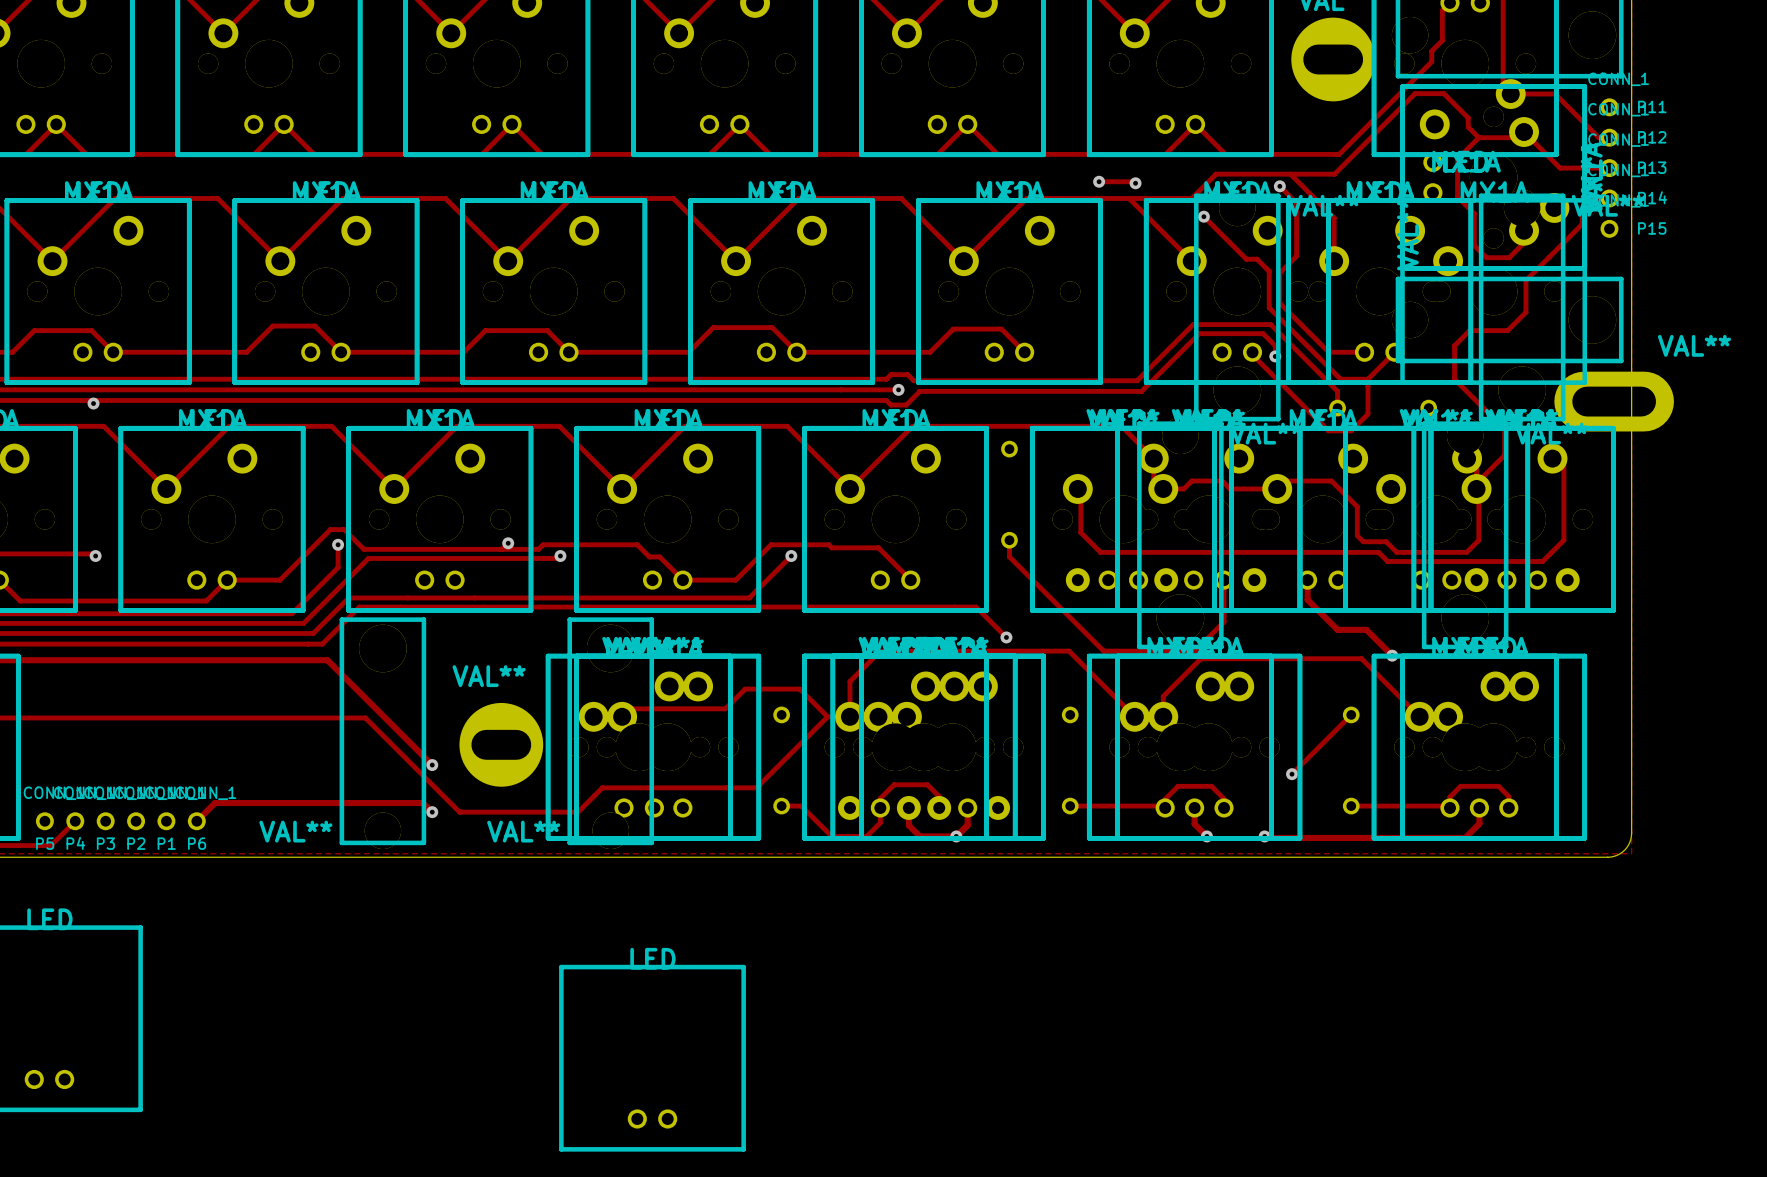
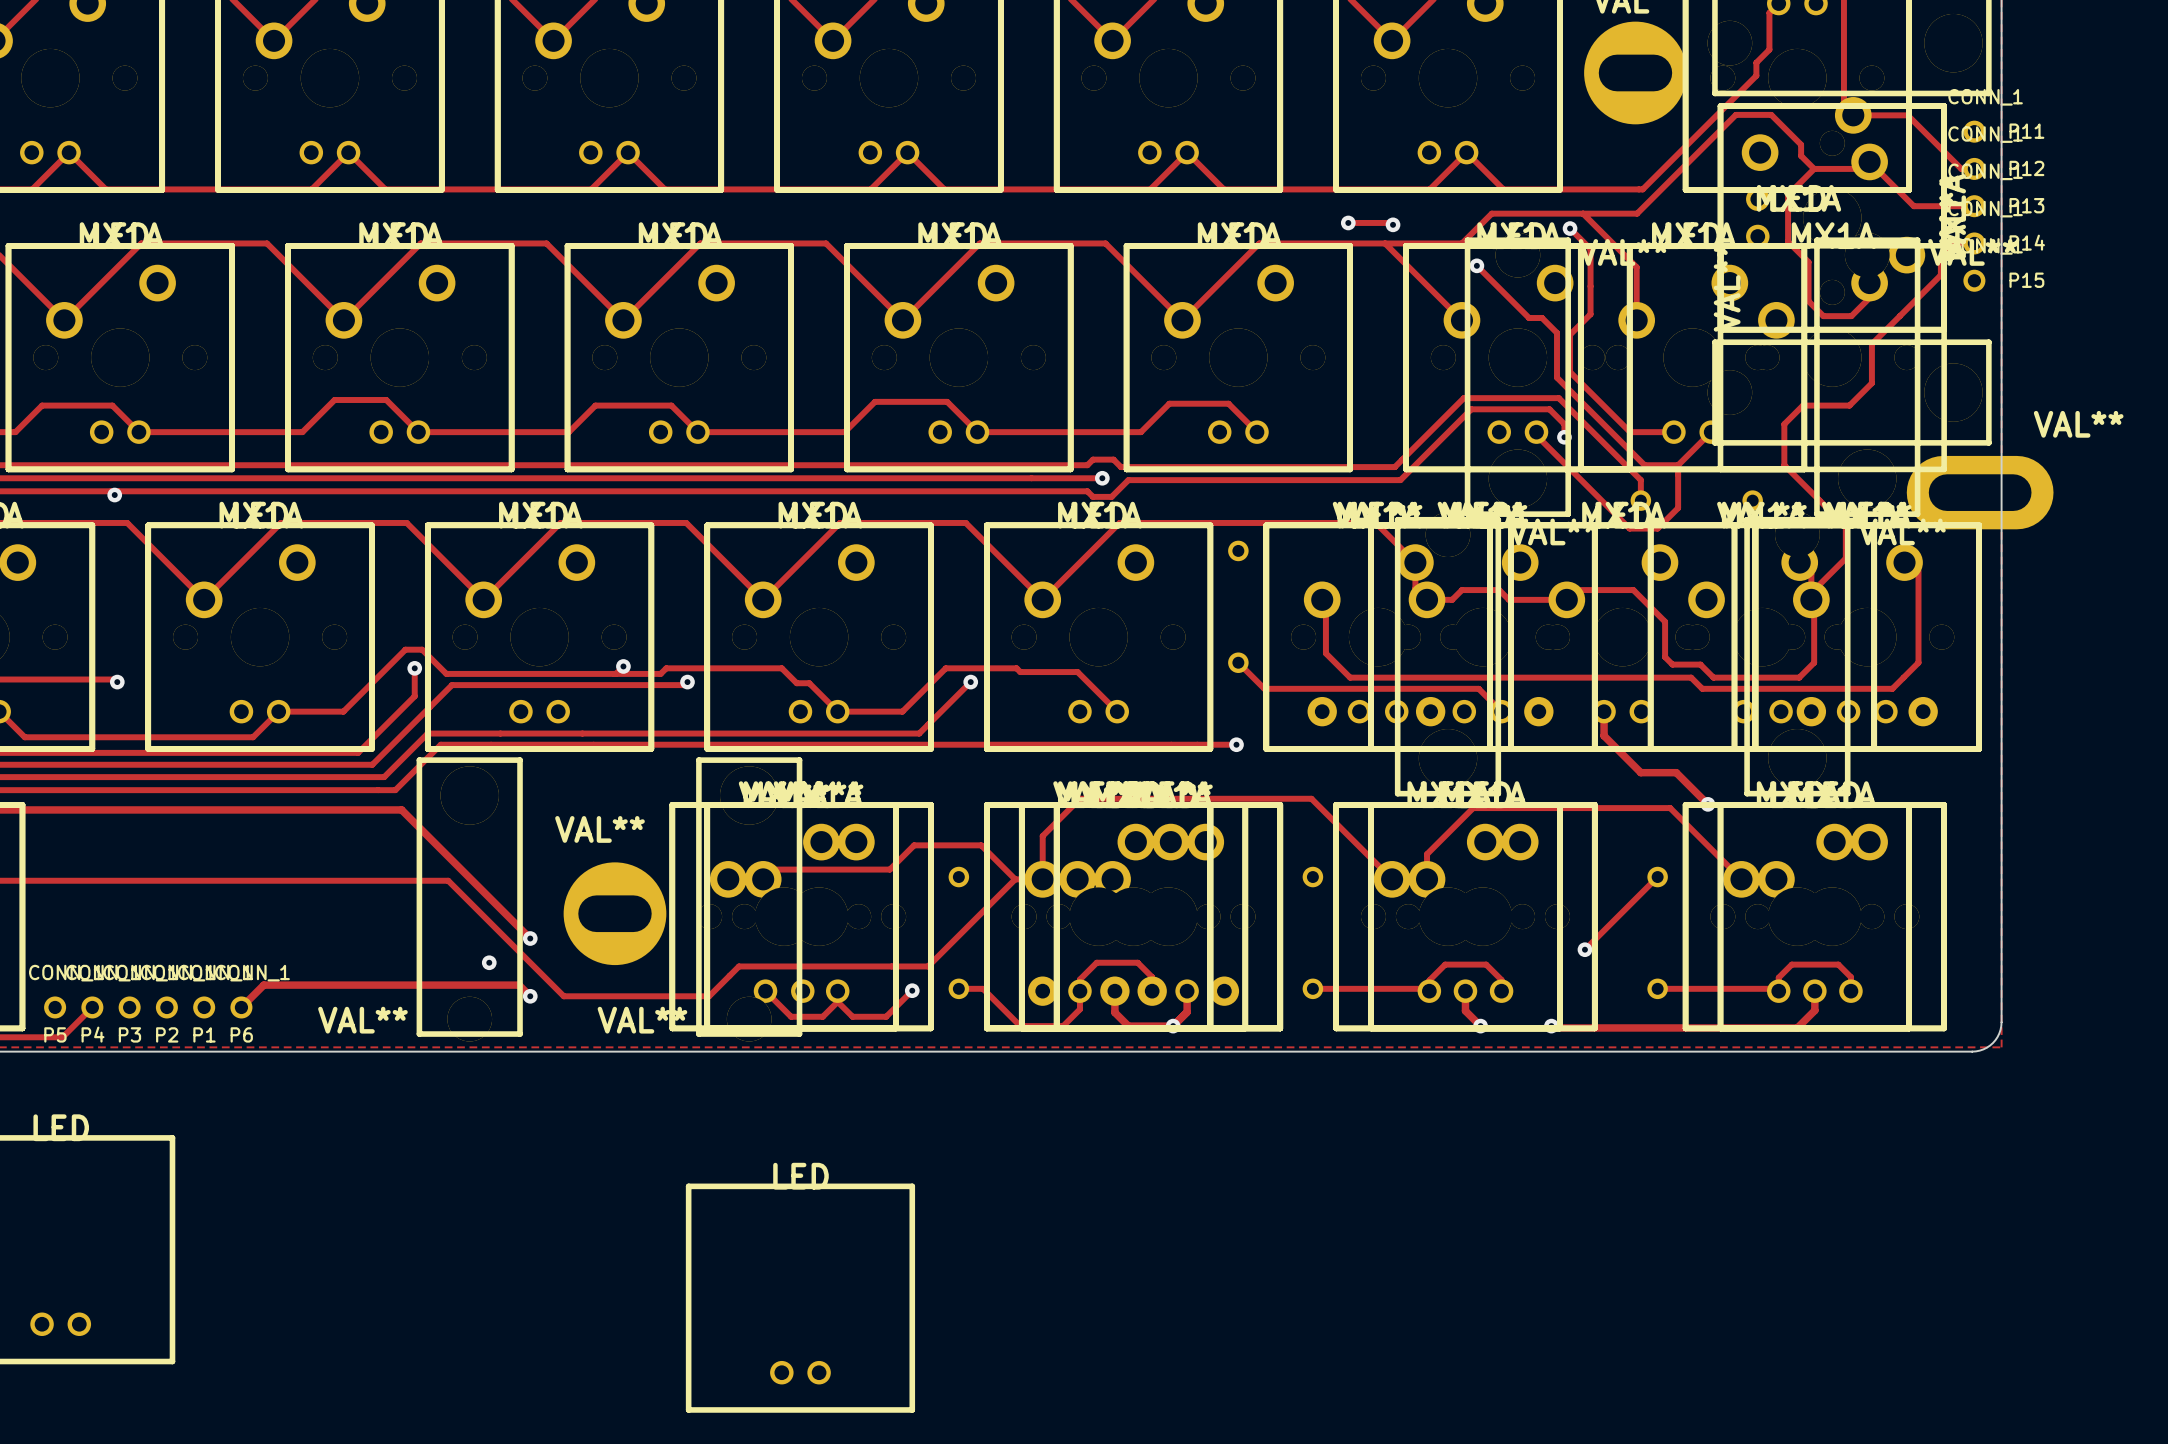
track: (1009, 540) (1009, 556) (1103, 651) (1194, 651) (1224, 621) (1224, 580) -> (1238, 662) (1264, 688) (1478, 688) (1501, 711)
track: (976, 607) (1006, 637) -> (1197, 744) (1236, 744)
via position: (1006, 637) -> (1236, 744)
via: none -> (489, 962)
track: none -> (765, 991) (791, 1016) (822, 1016) (837, 1001)
track: none -> (912, 990) (886, 1016) (852, 1016) (837, 1001)
via: none -> (912, 990)

